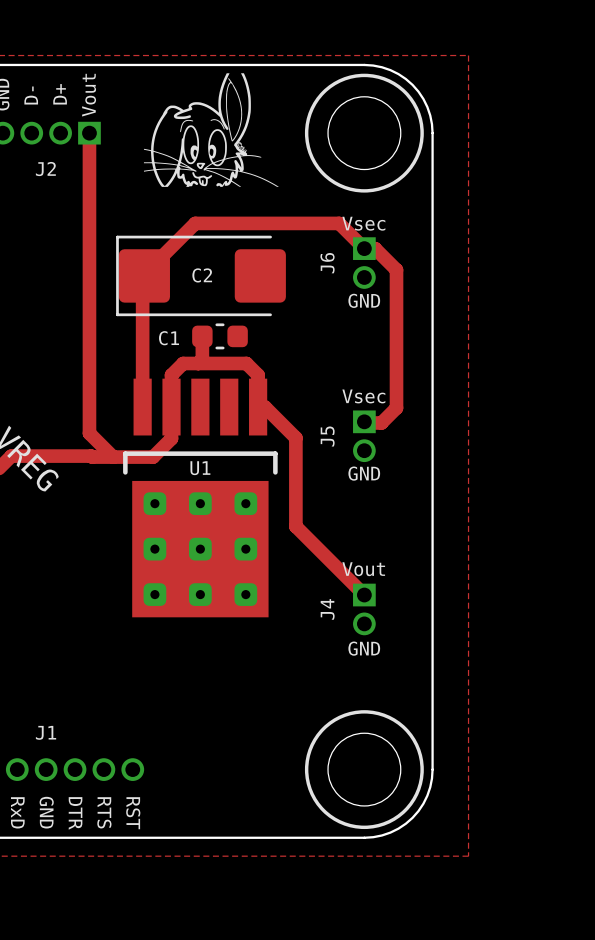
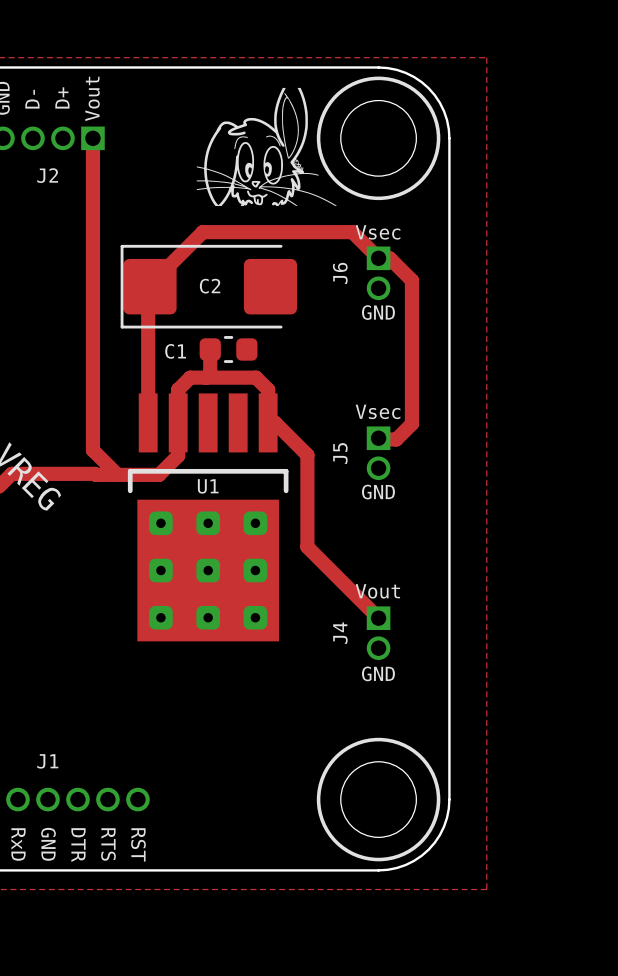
drawing position: (211, 130) -> (266, 146)

